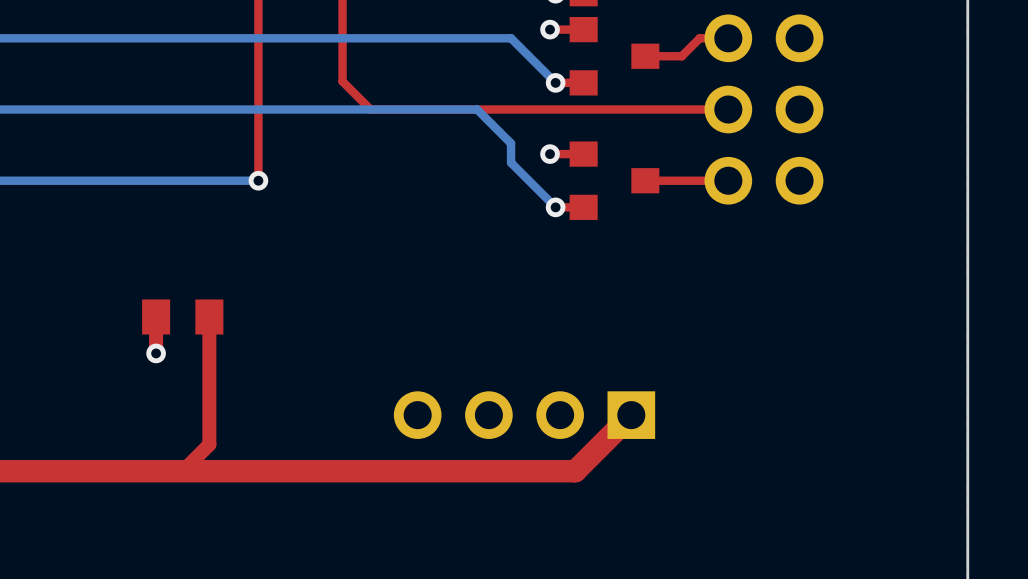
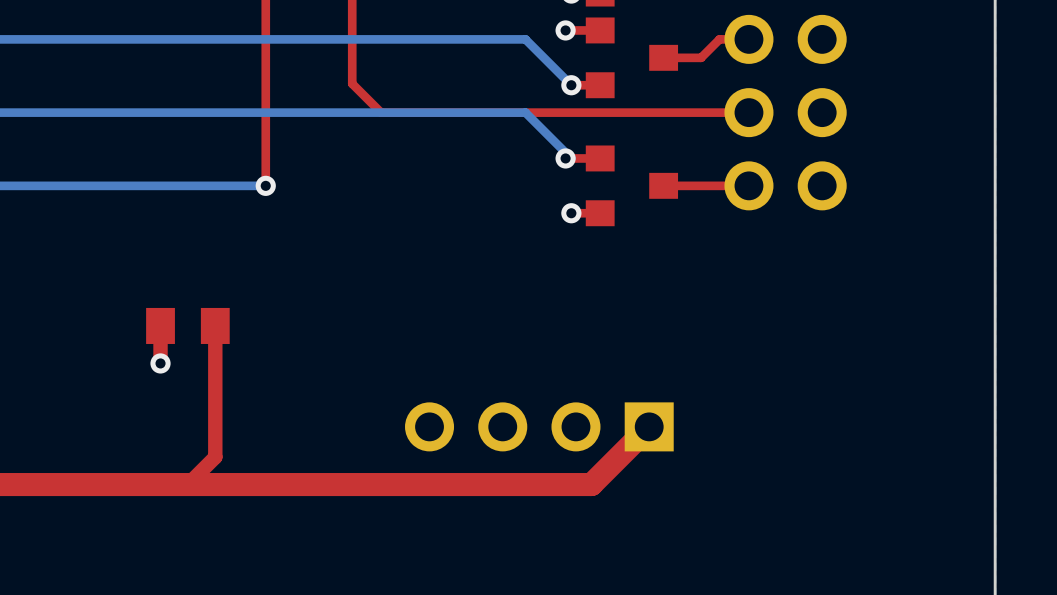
bottom track: (477, 109) (511, 143) (511, 162) (555, 207) -> (490, 112) (525, 112) (571, 158)

